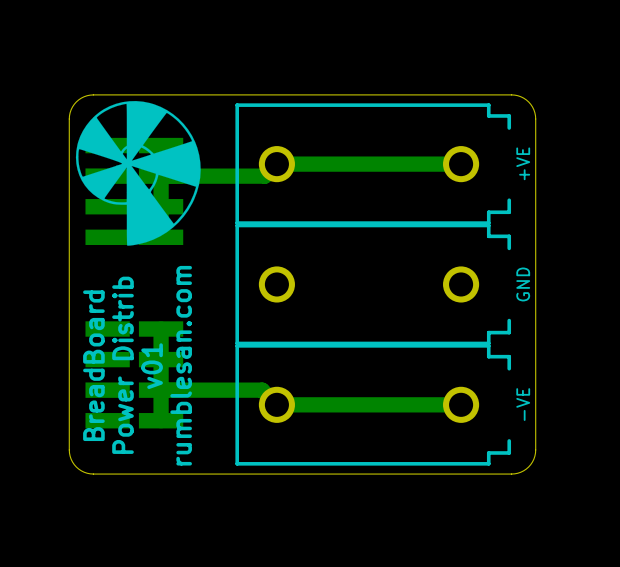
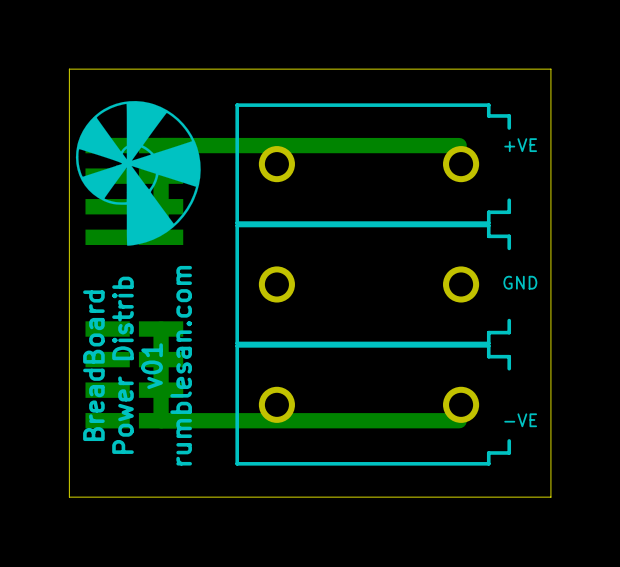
board edge: (93, 94) (511, 94) (526, 99) (532, 106) (535, 118) (535, 449) (530, 464) (523, 470) (511, 474) (93, 474) (78, 469) (72, 462) (69, 449) (69, 118) (71, 109) (76, 101) (84, 96) (93, 94) -> (69, 69) (69, 497) (550, 497) (550, 69) (69, 69)
bottom track: none -> (161, 145) (459, 145)
text rotation: 0° (523, 163) -> 90° clockwise (520, 145)
bottom track: (461, 164) (276, 164) (264, 176) (161, 176) -> none
text rotation: 0° (523, 284) -> 90° clockwise (520, 282)
bottom track: (161, 390) (262, 390) (276, 404) (461, 404) -> none
text rotation: 0° (523, 404) -> 90° clockwise (520, 420)
bottom track: none -> (161, 420) (459, 420)

